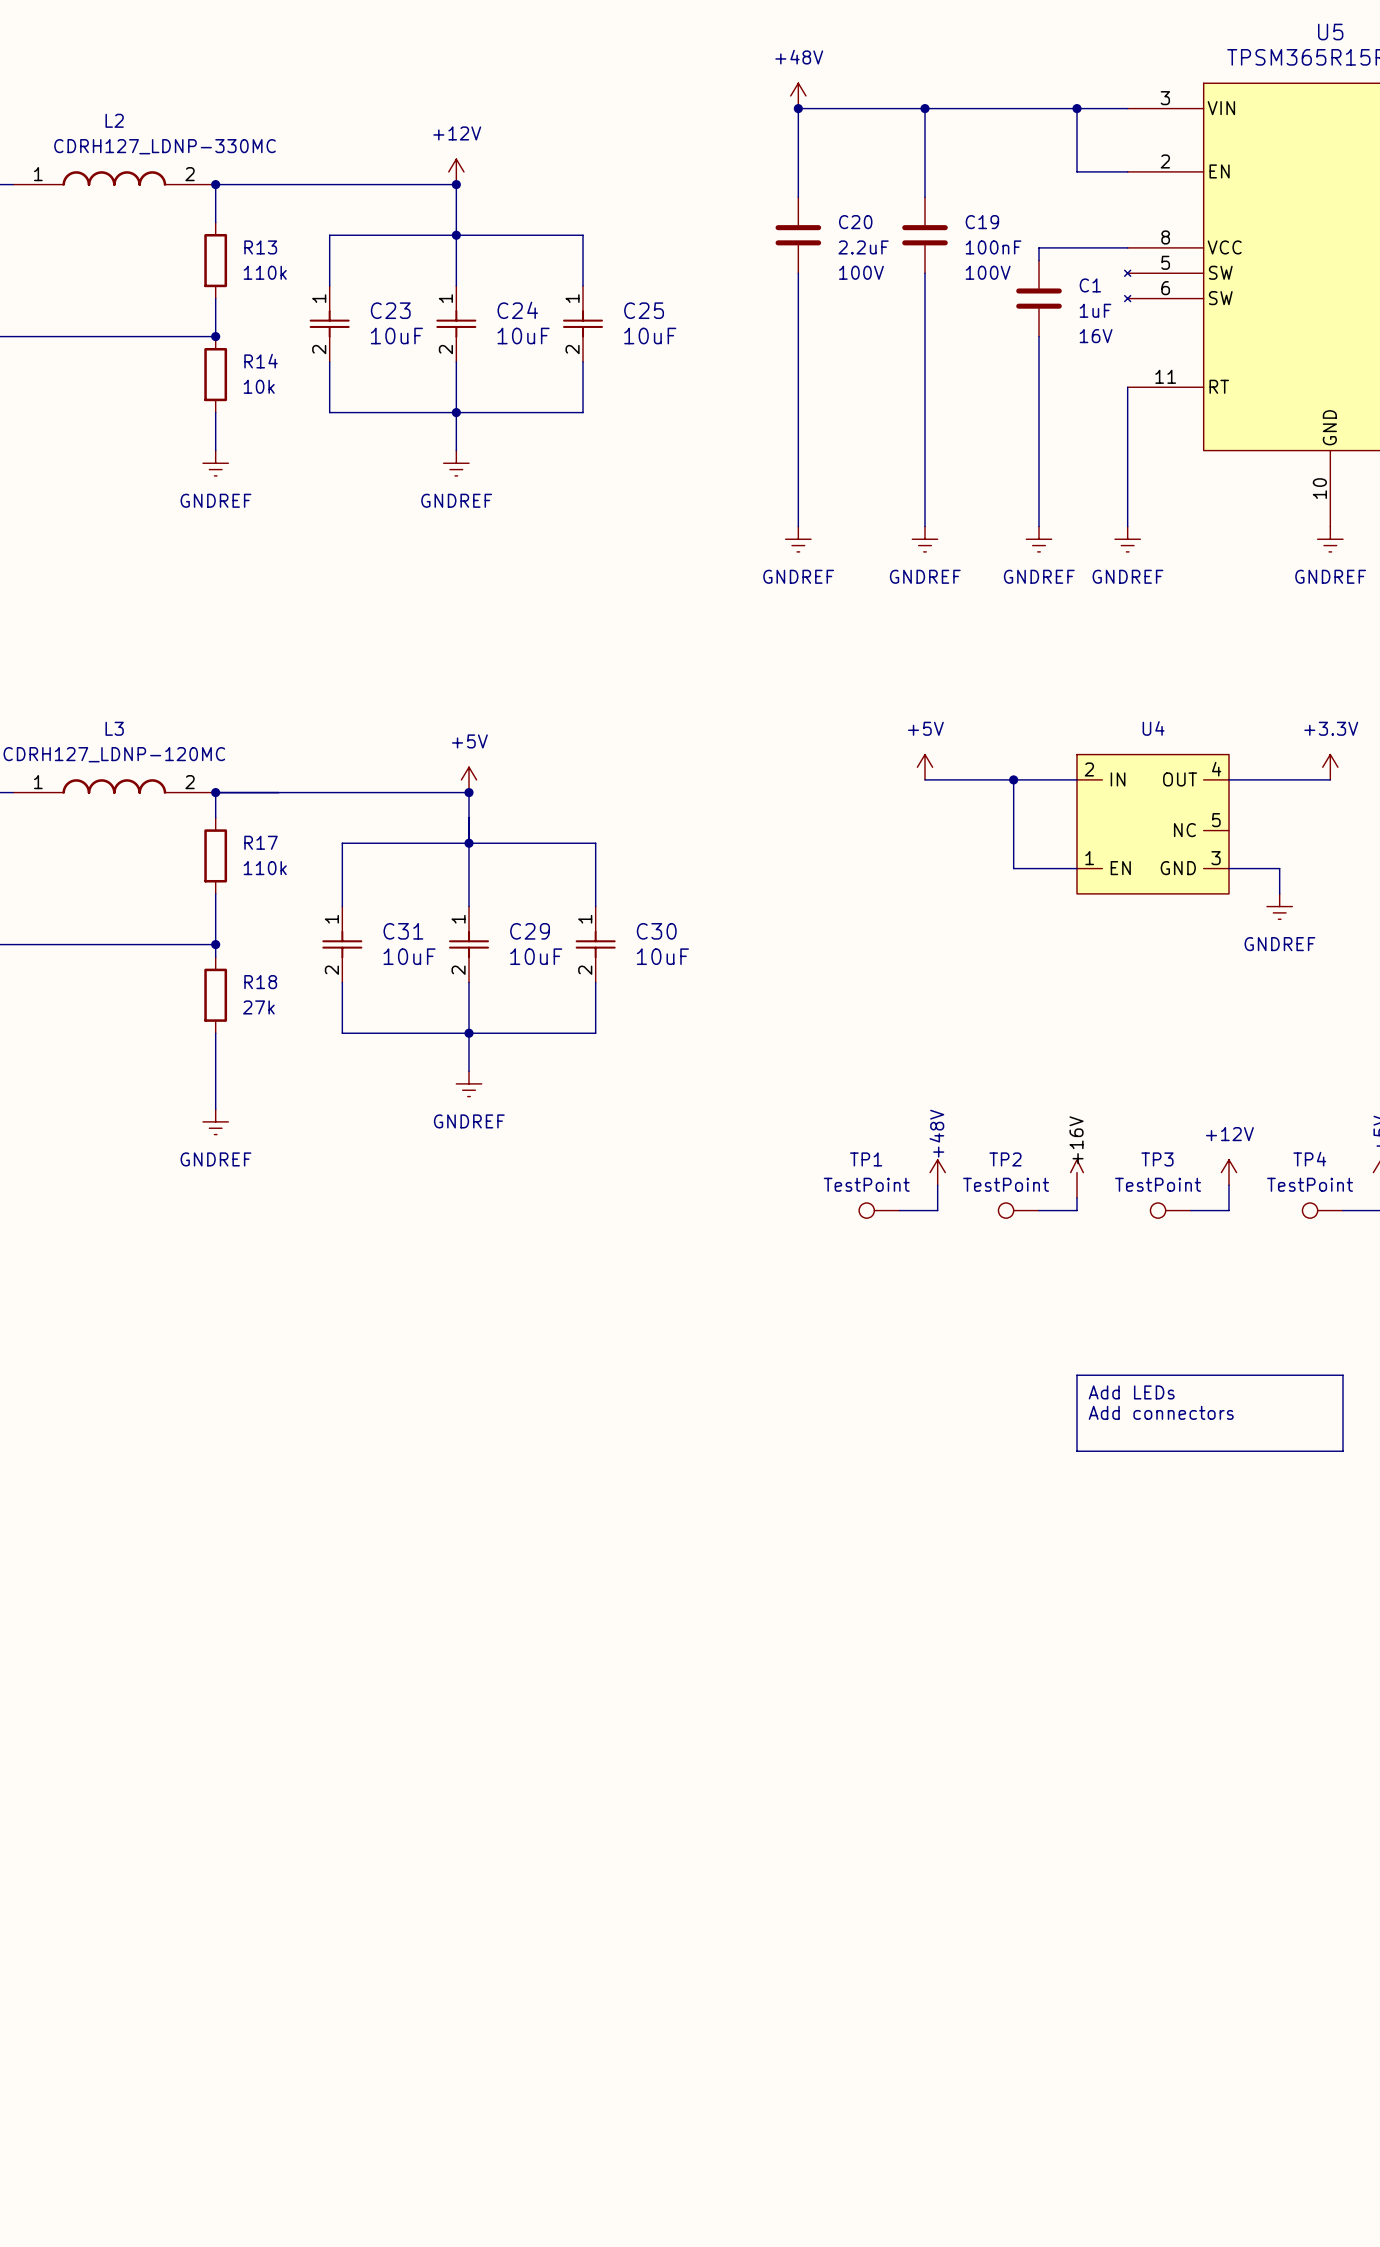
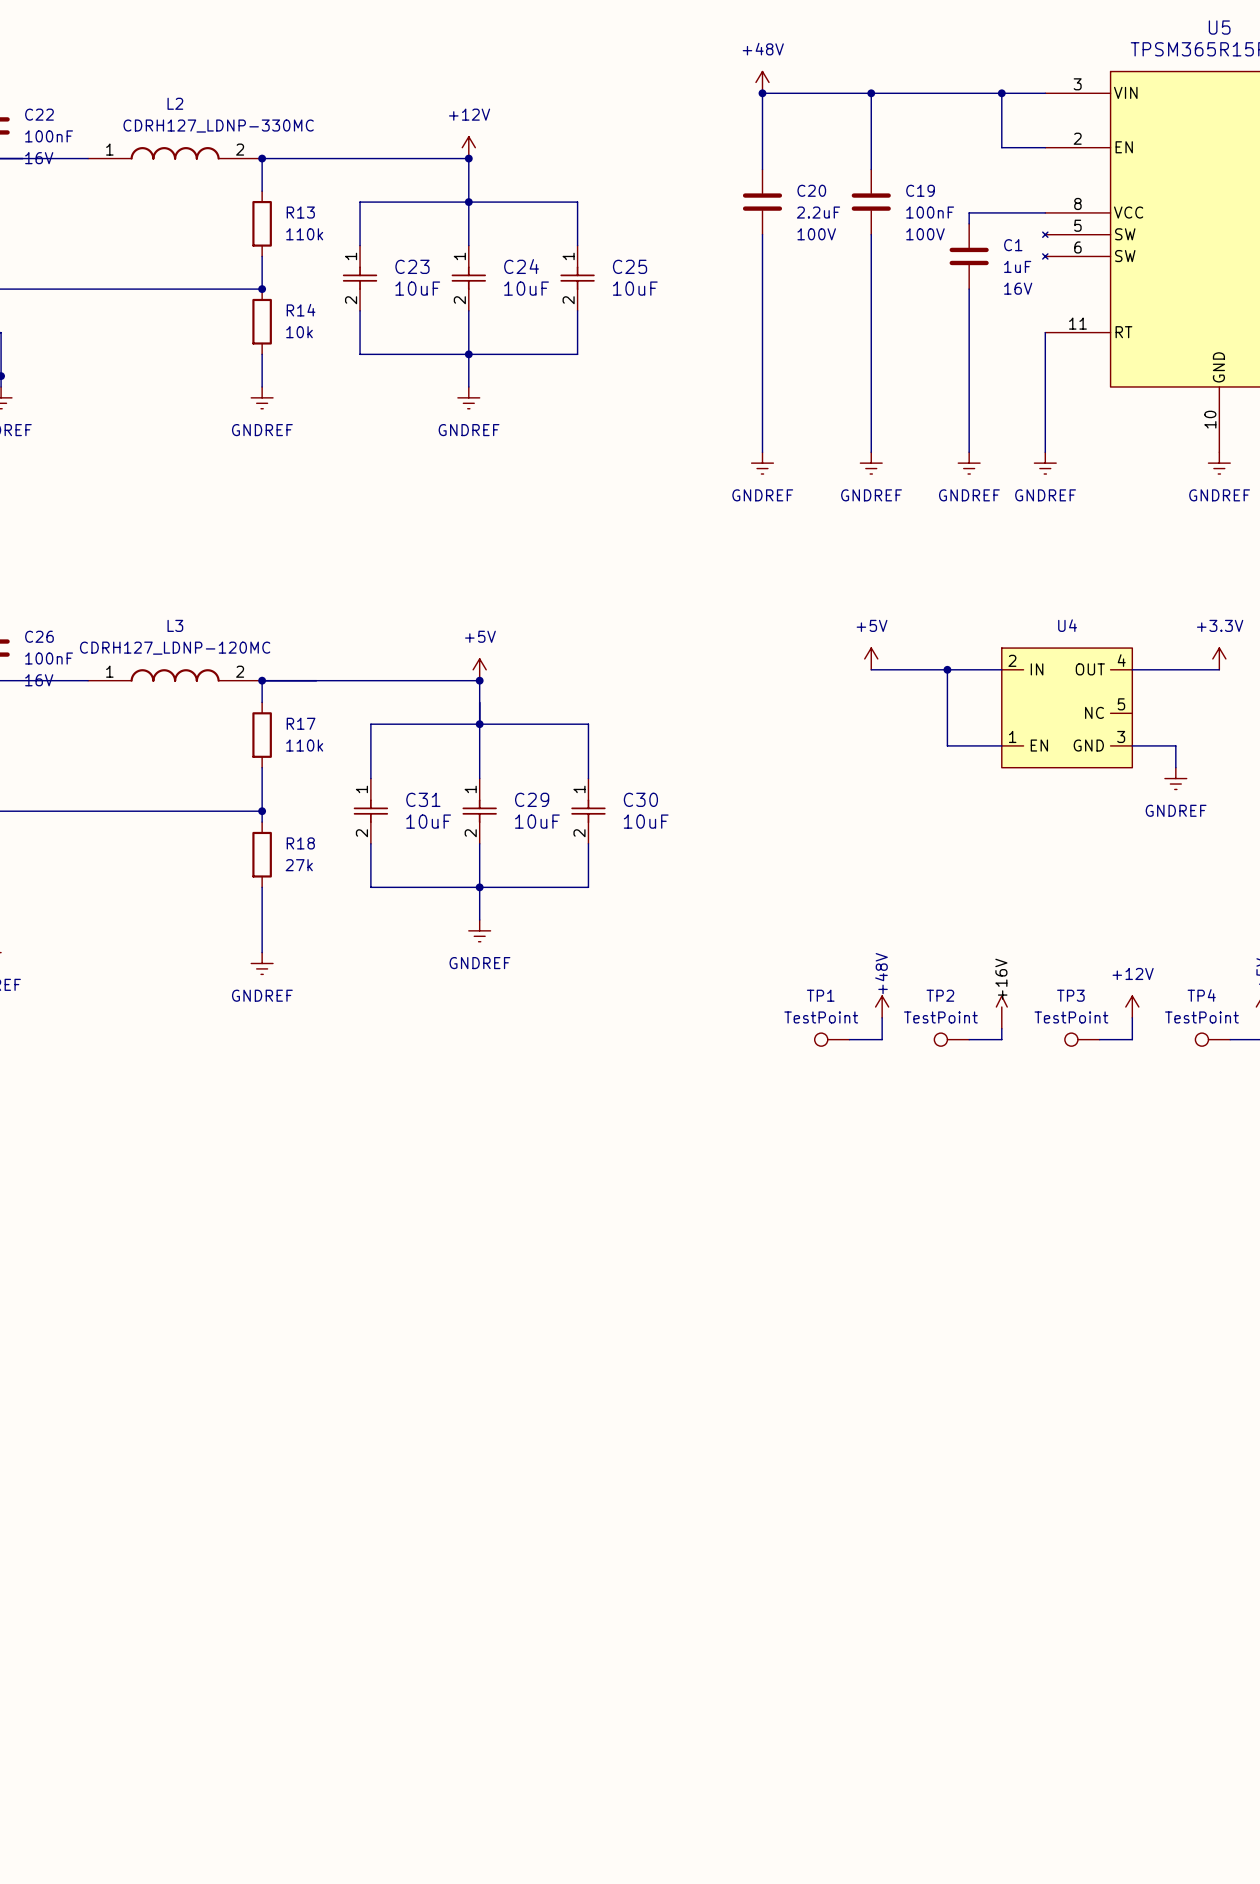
line: (1077, 1375) (1343, 1375) (1343, 1451) (1077, 1451) (1077, 1375) -> none
text: Add LEDs (1131, 1392) -> none
text: Add connectors (1161, 1412) -> none

